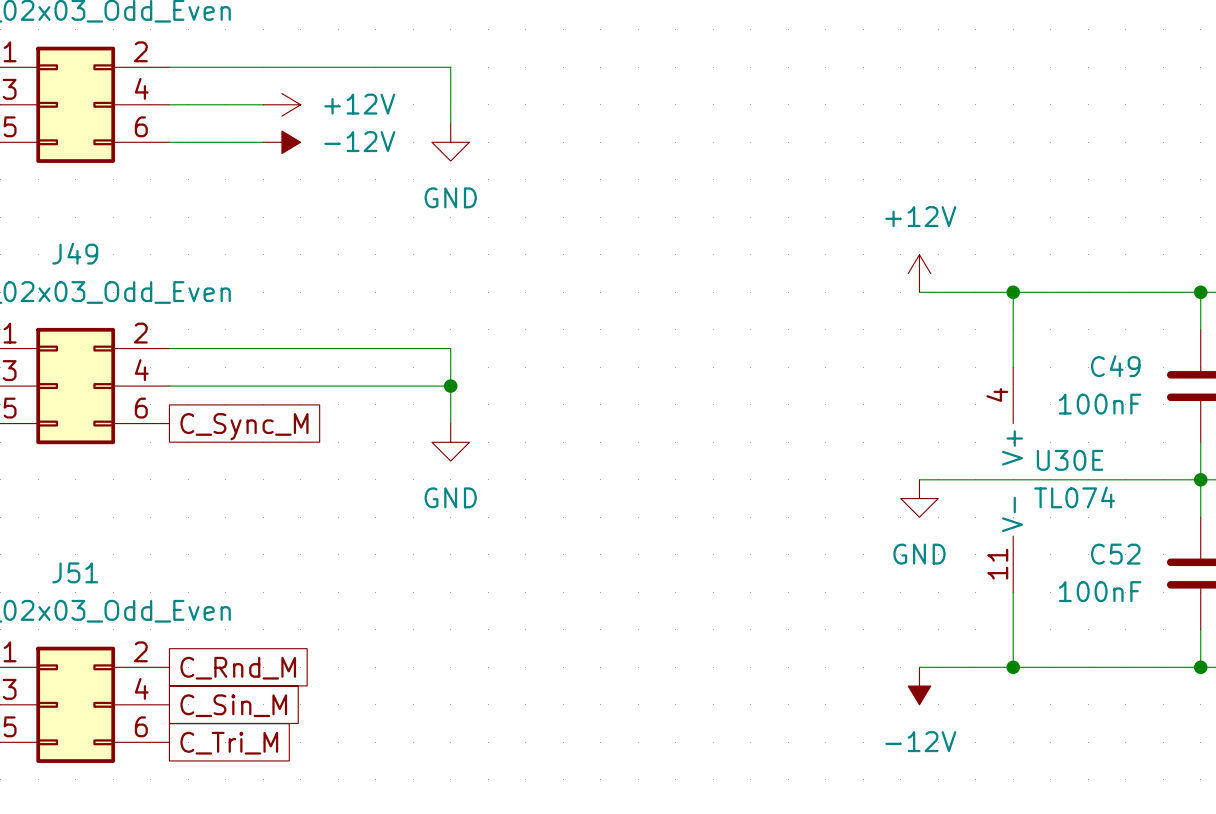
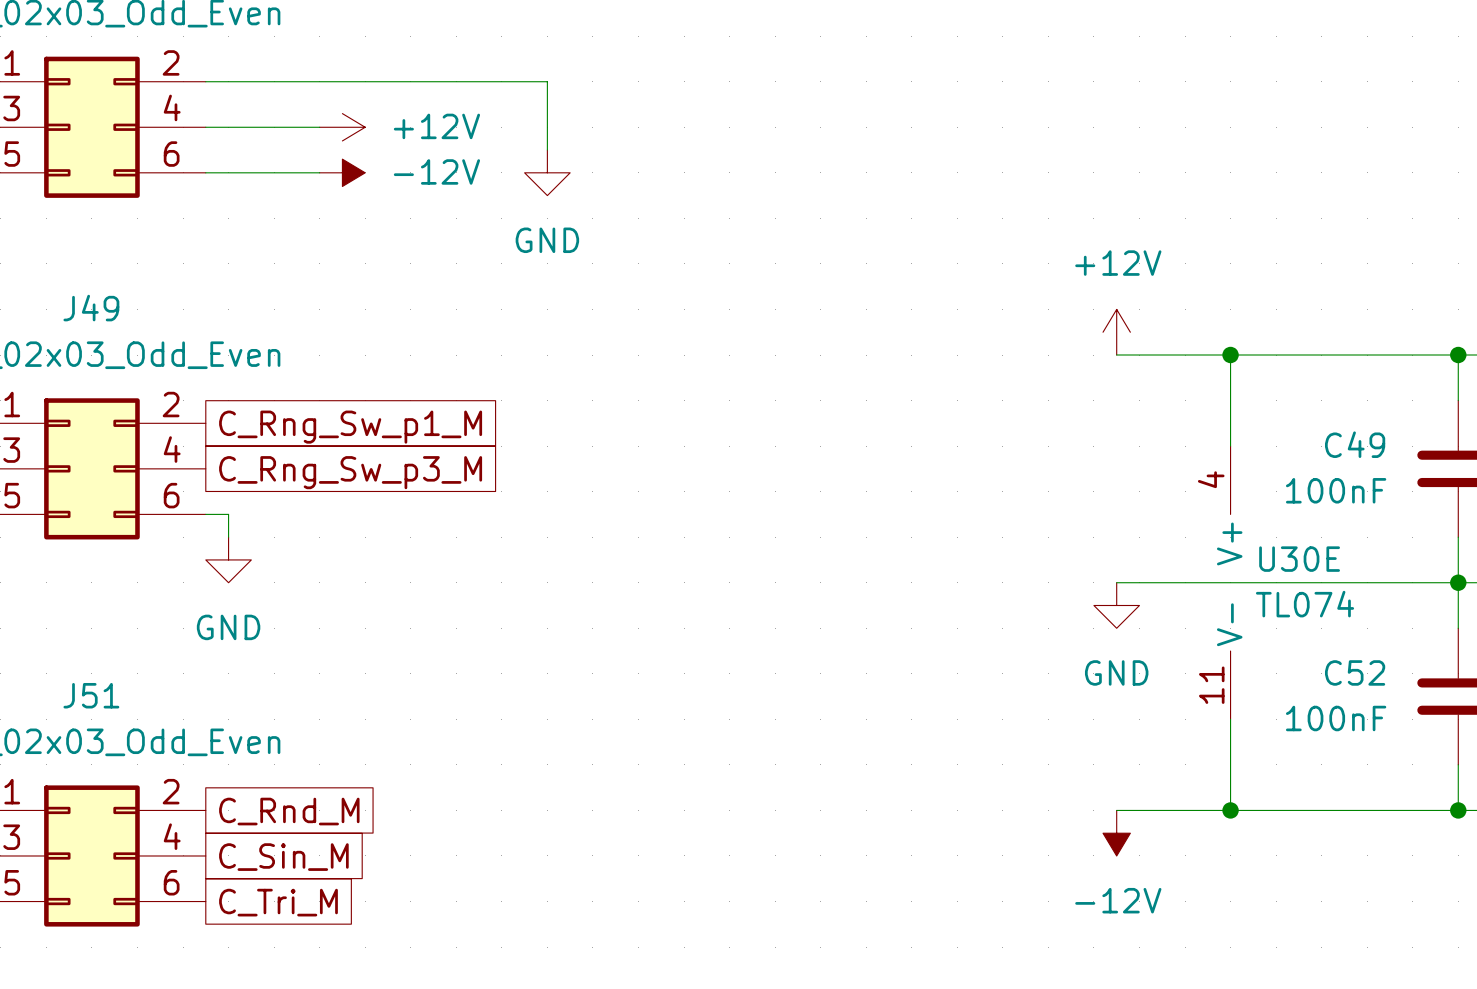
wire: (169, 348) (450, 348) (450, 423) -> none
global label: none -> C_Rng_Sw_p1_M (350, 427)
wire: (169, 386) (450, 386) -> none
junction: (450, 386) -> none
global label: none -> C_Rng_Sw_p3_M (350, 472)
wire: none -> (205, 514) (228, 514) (228, 537)
global label: C_Sync_M (244, 426) -> none
power symbol: GND (450, 442) -> none
power symbol: none -> GND (228, 559)

